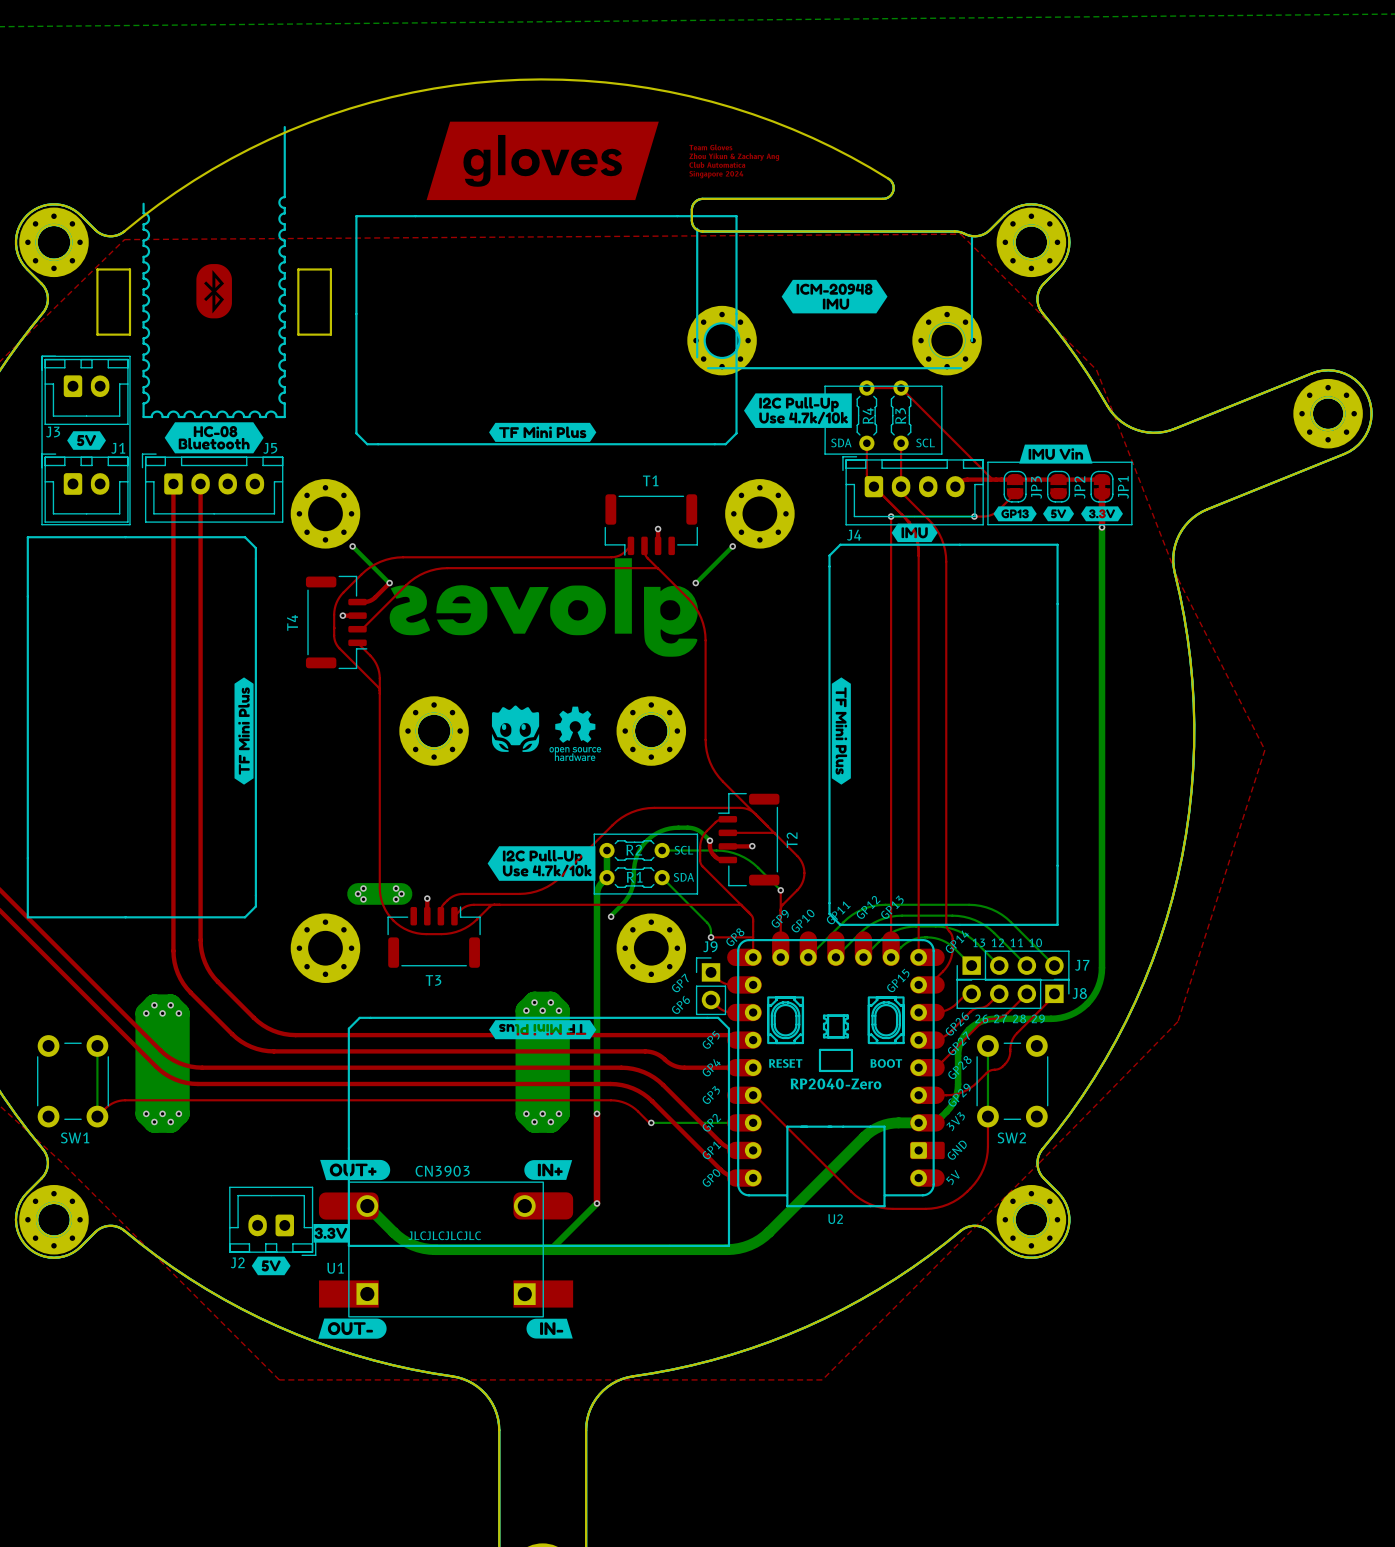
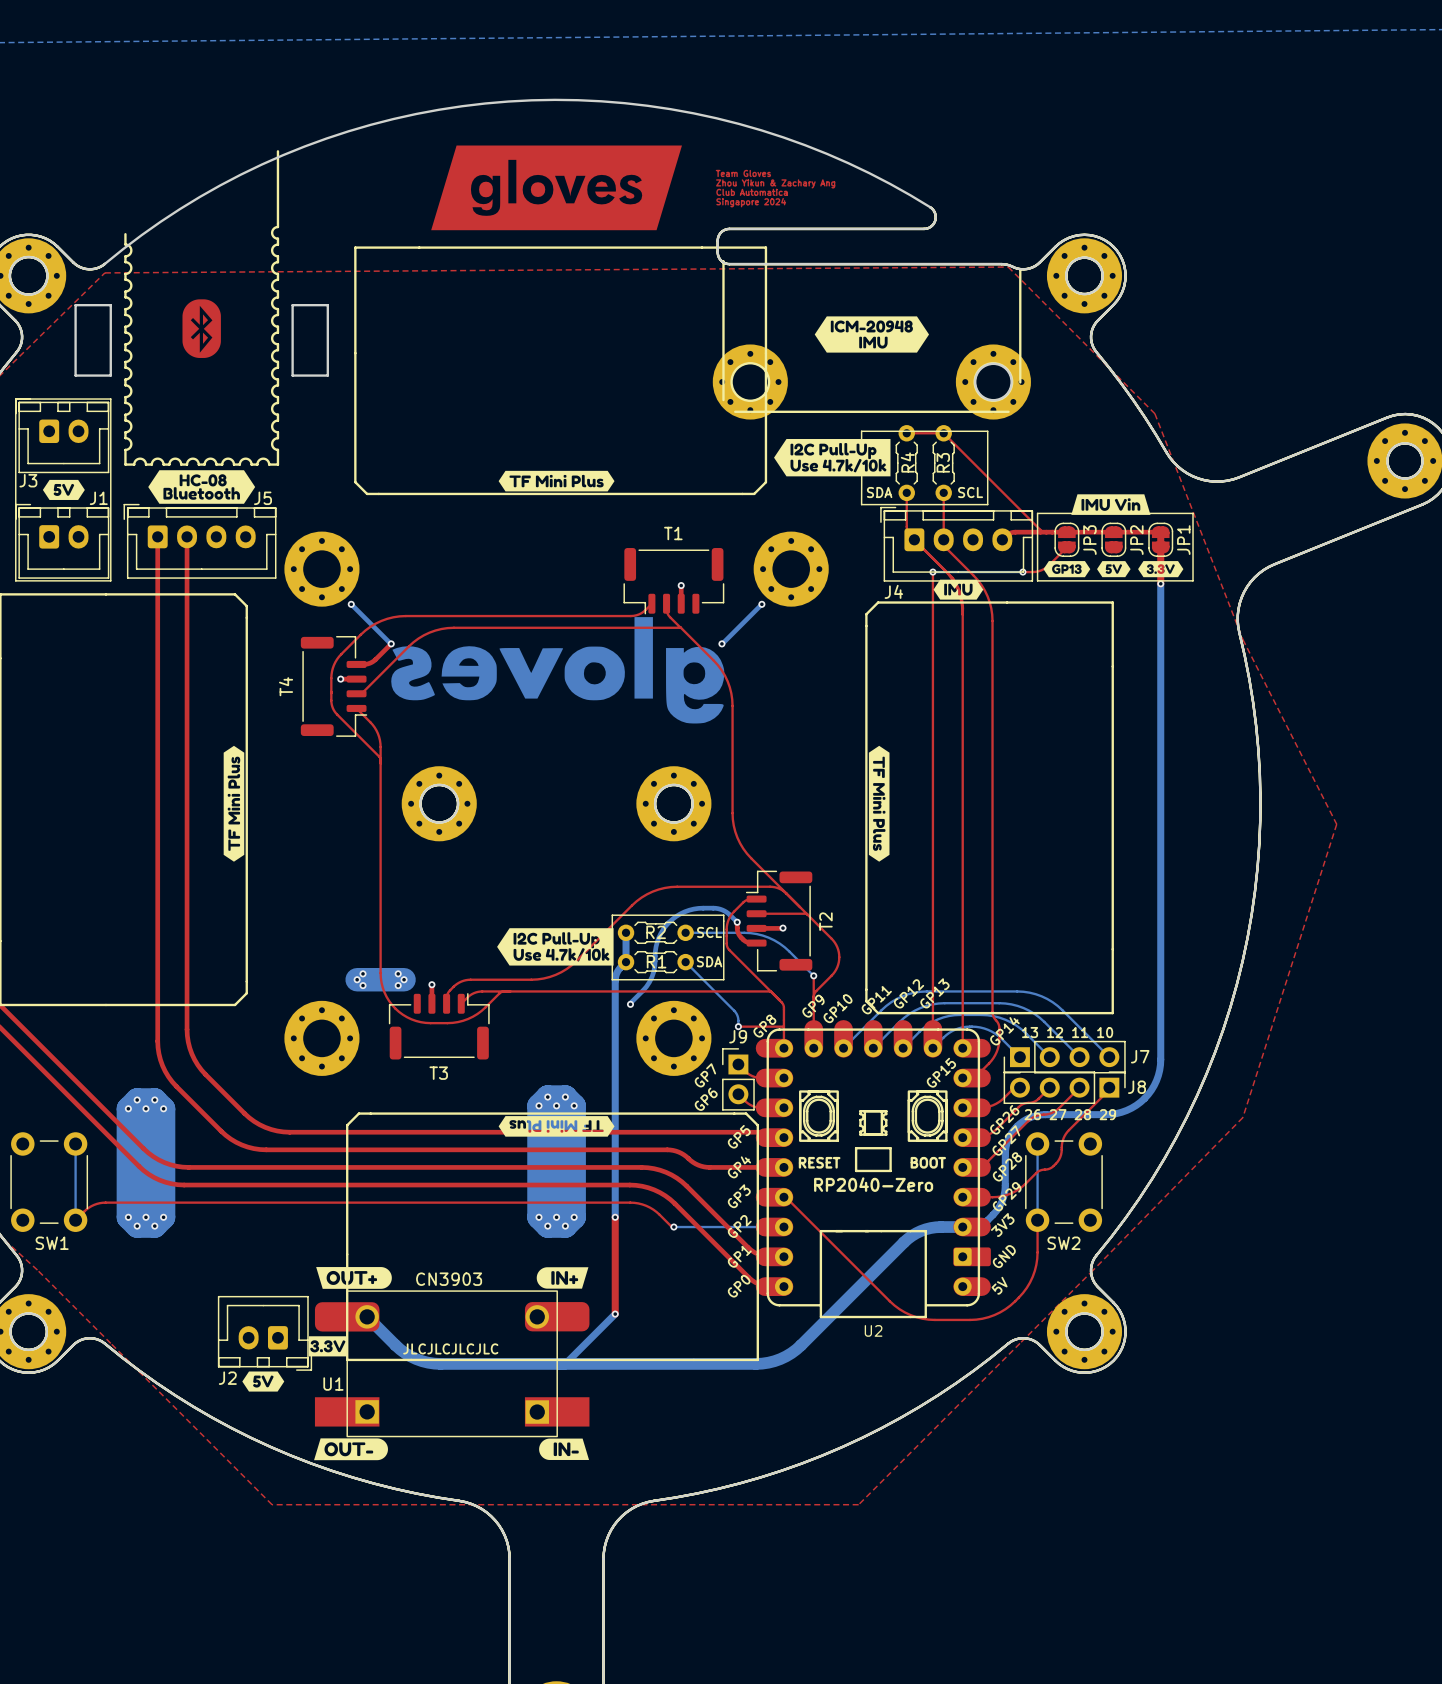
drawing: [491, 705, 602, 761] -> none

